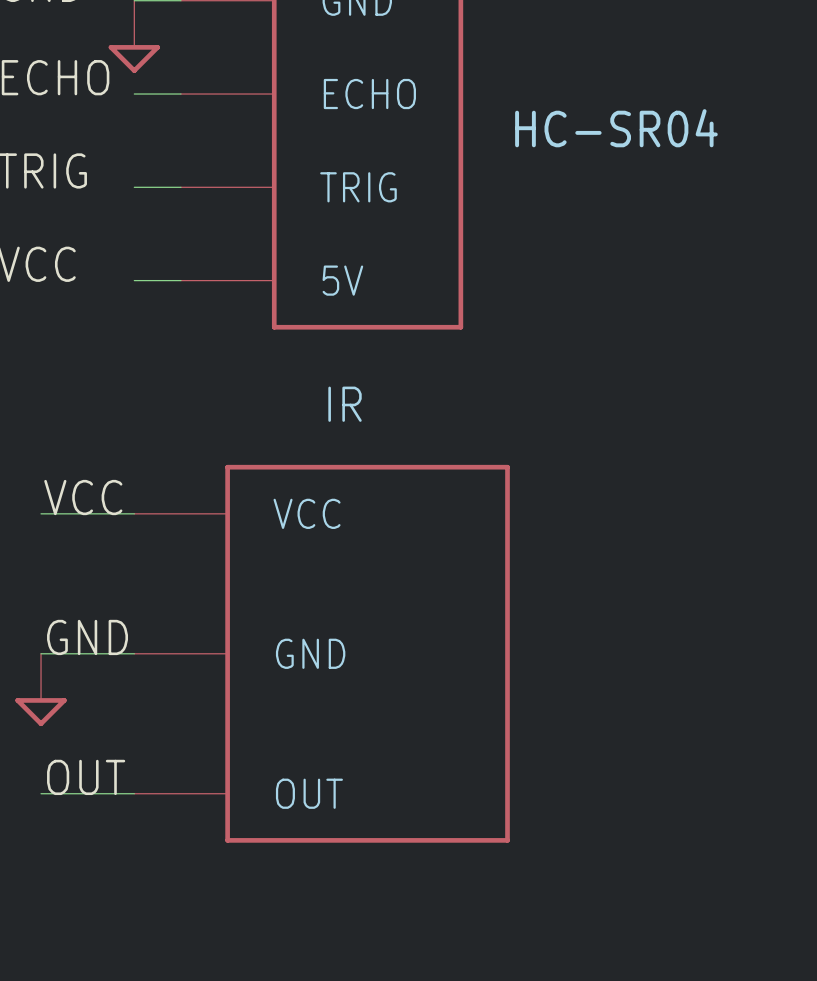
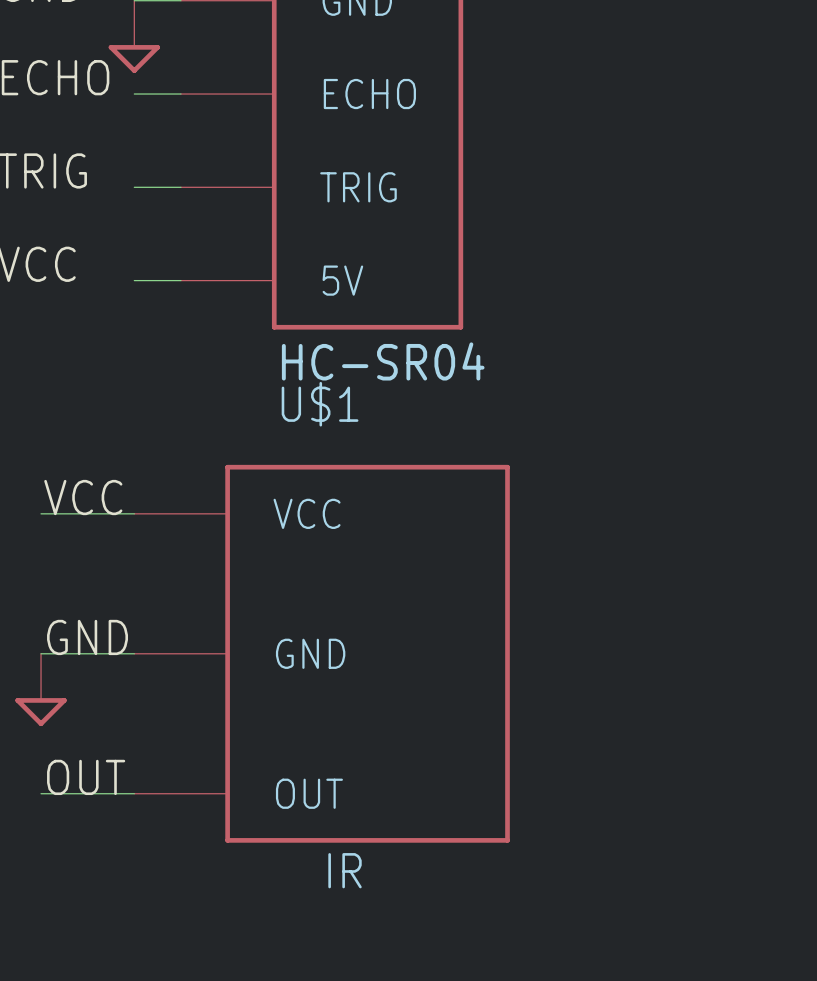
part value position: HC-SR04 (616, 128) -> HC-SR04 (383, 361)
U$1 name: none -> U$1 (320, 404)
U$1 value position: IR (345, 404) -> IR (345, 870)

